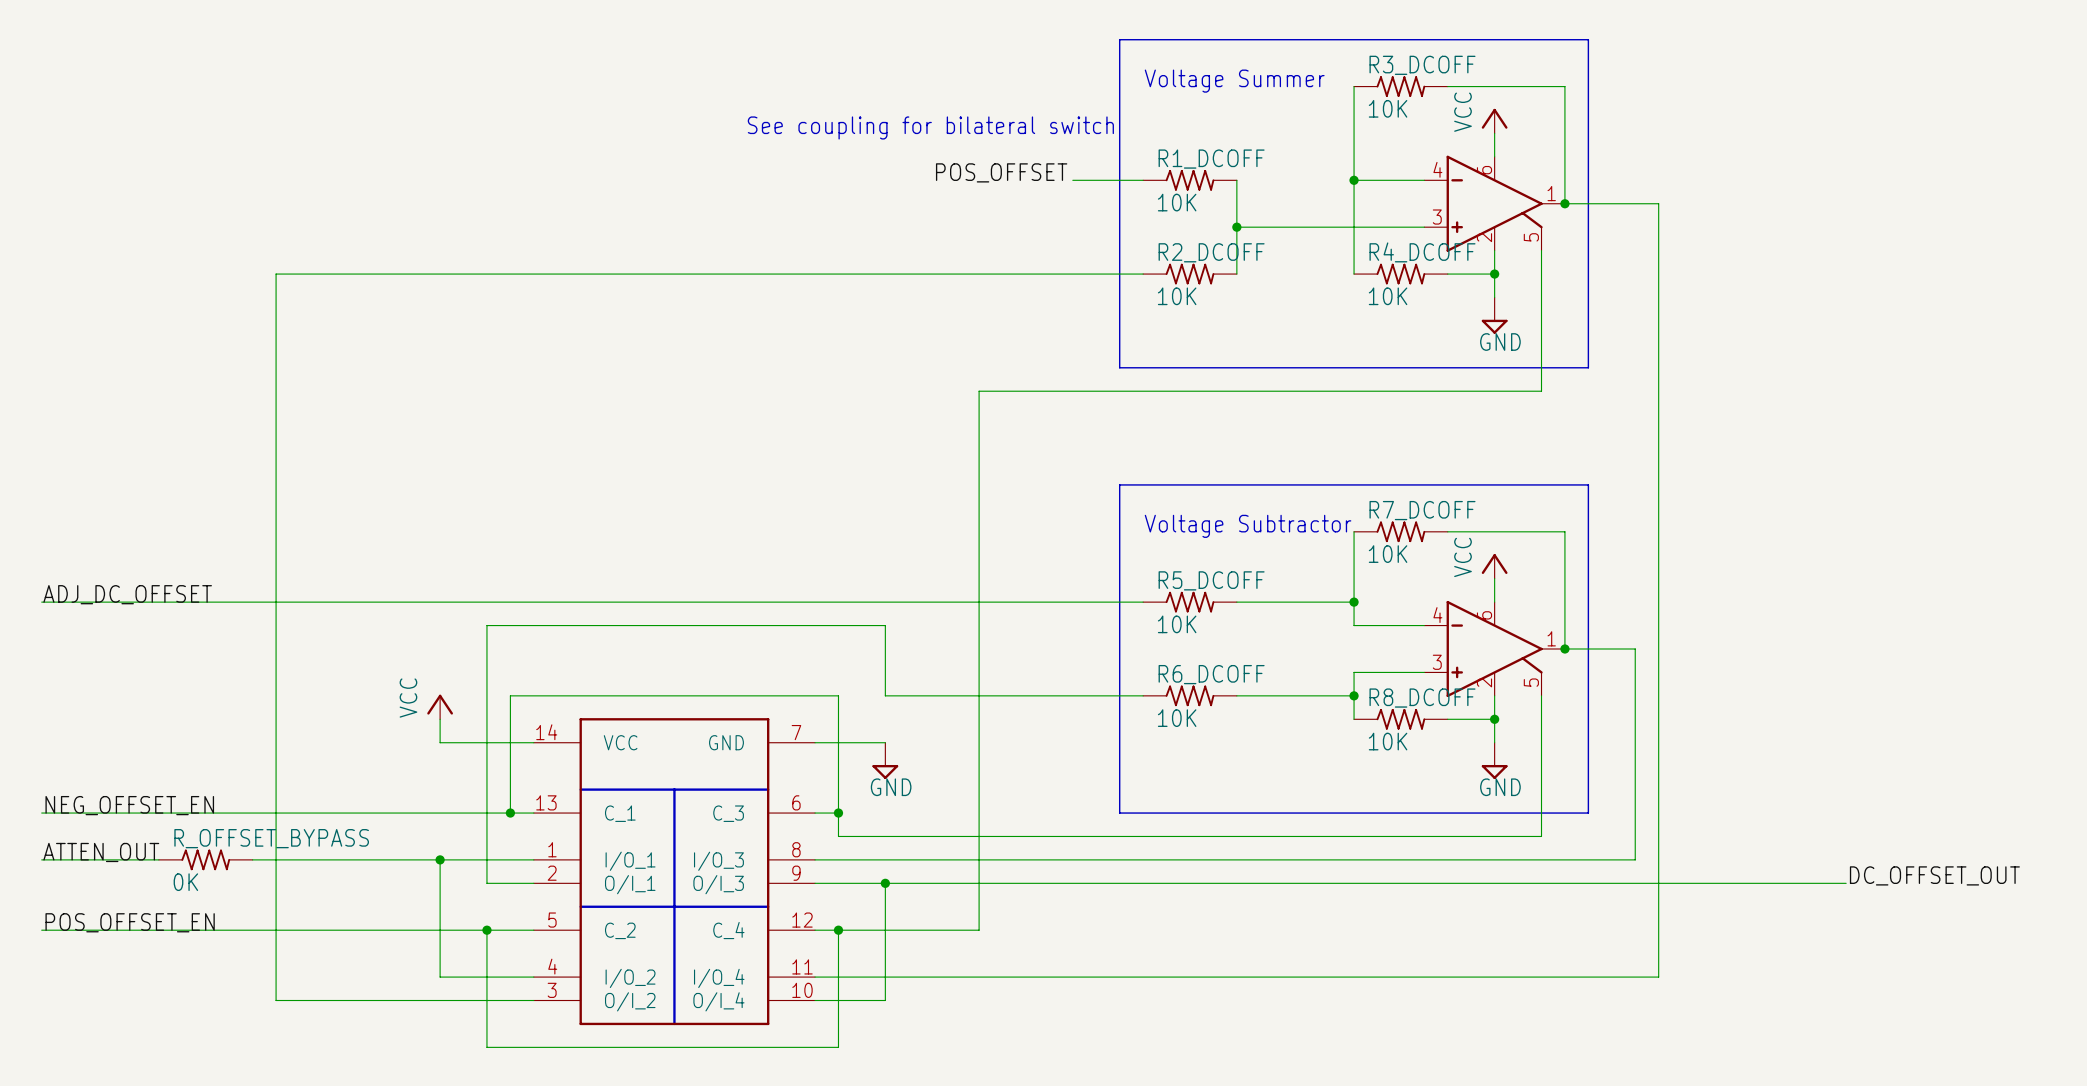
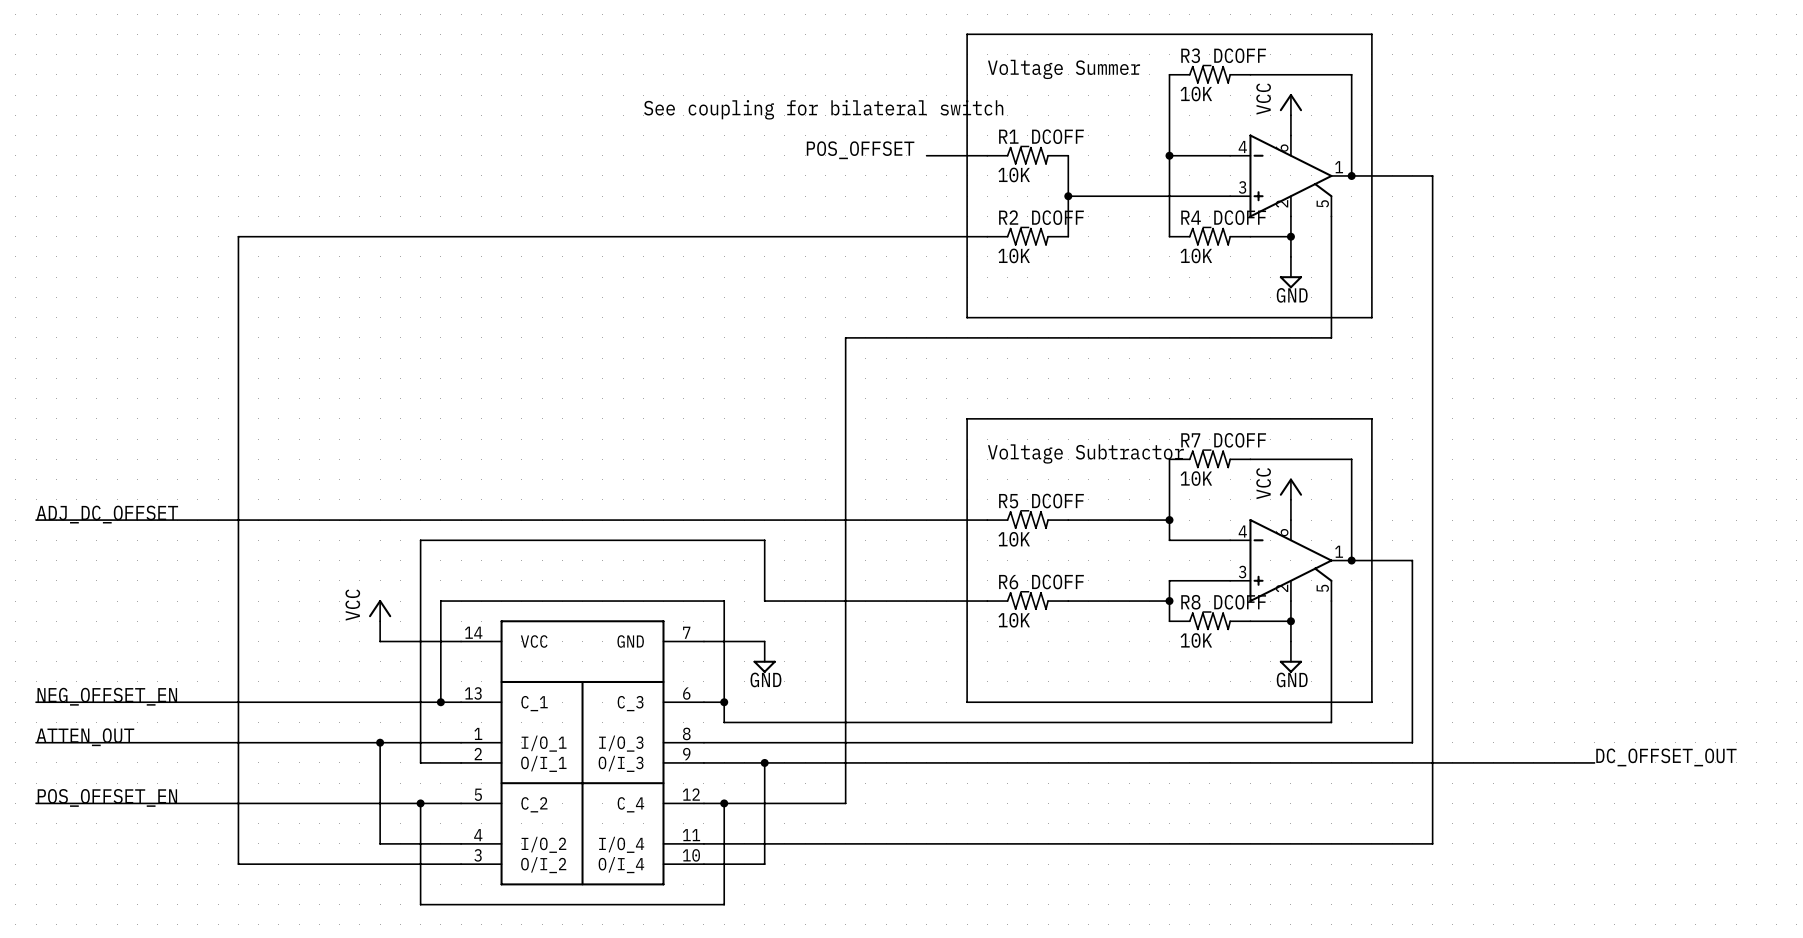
R_OFFSET_BYPASS: 0K (205, 859) -> none

